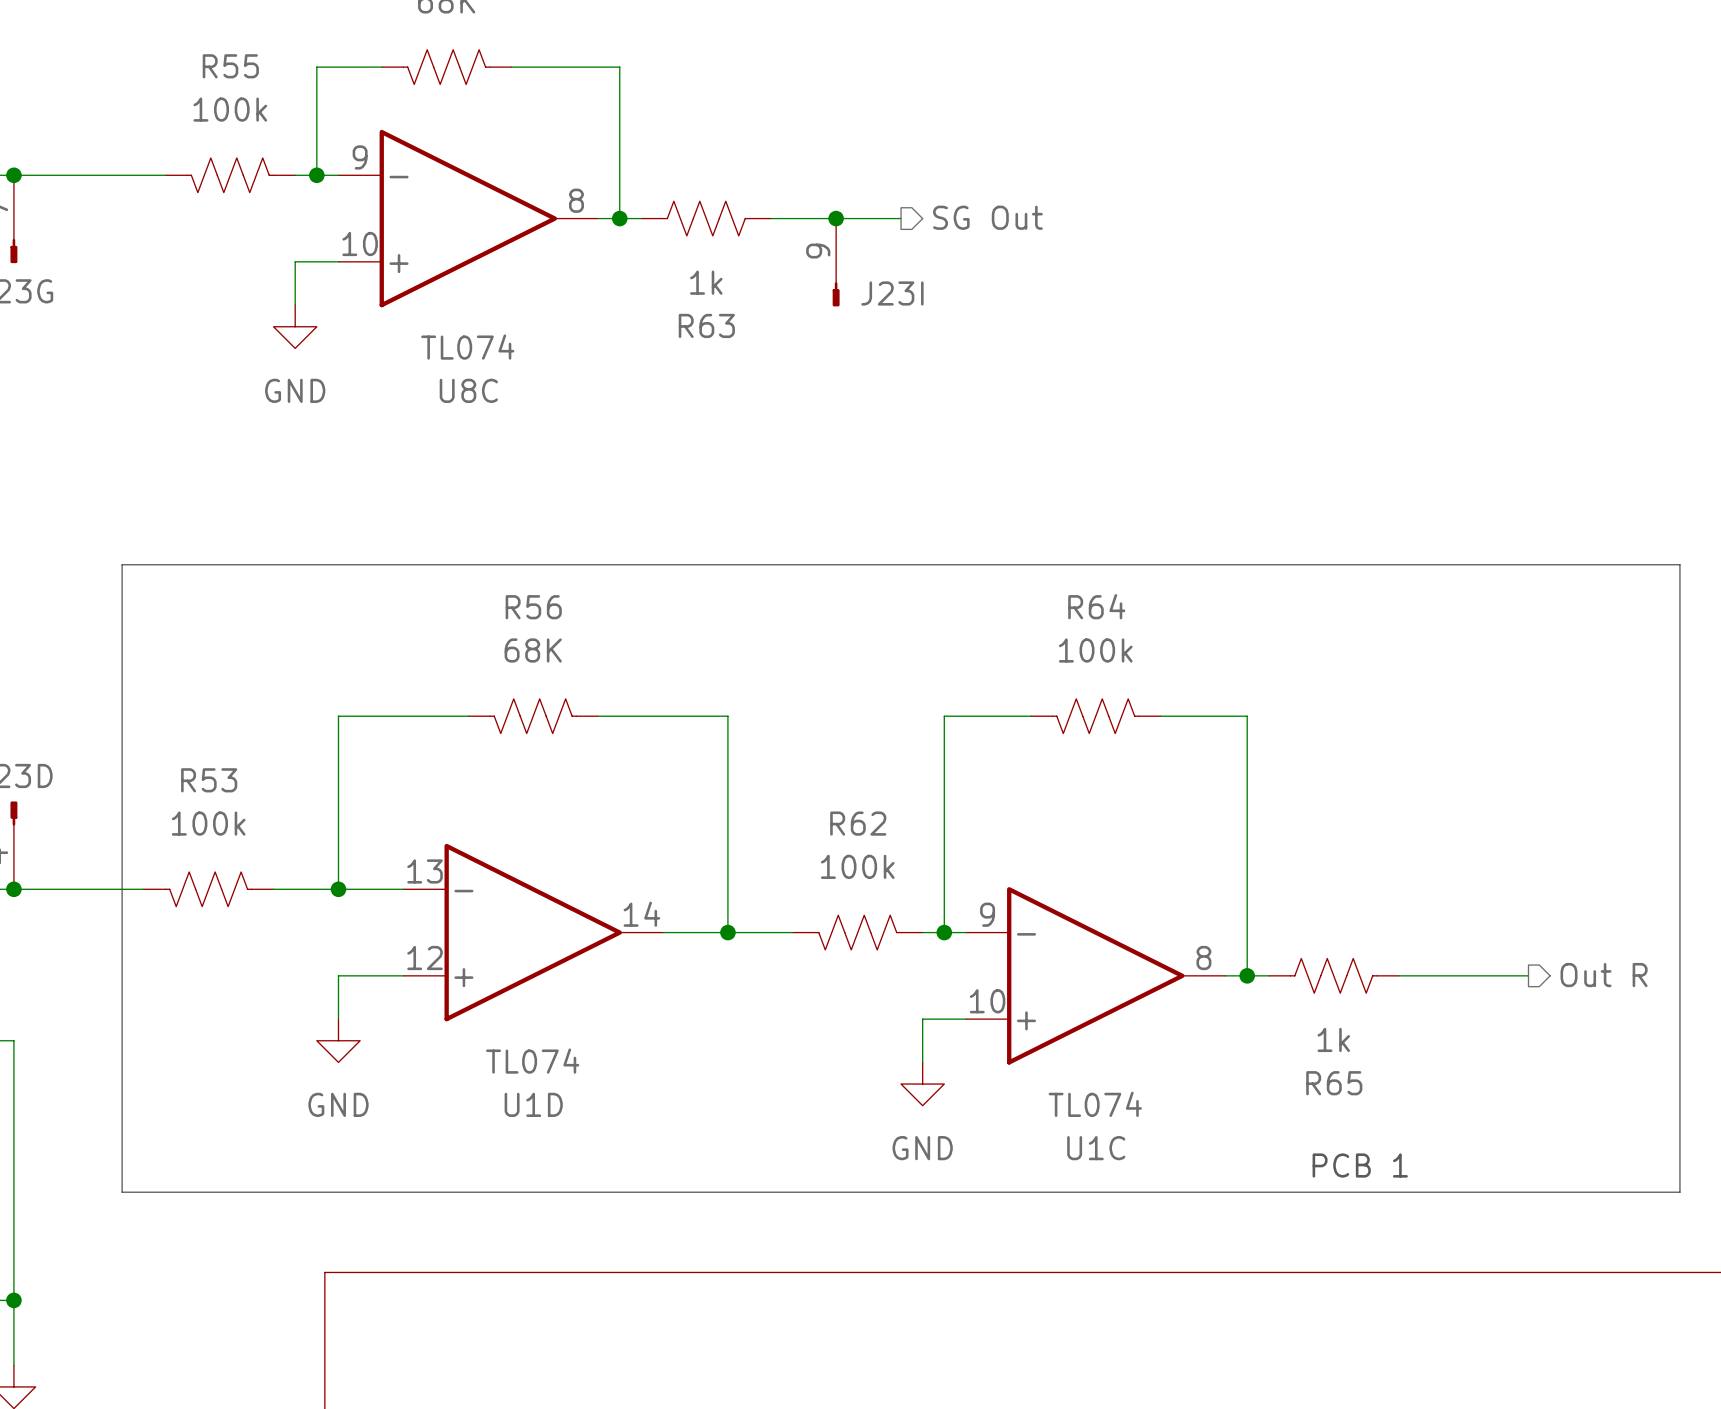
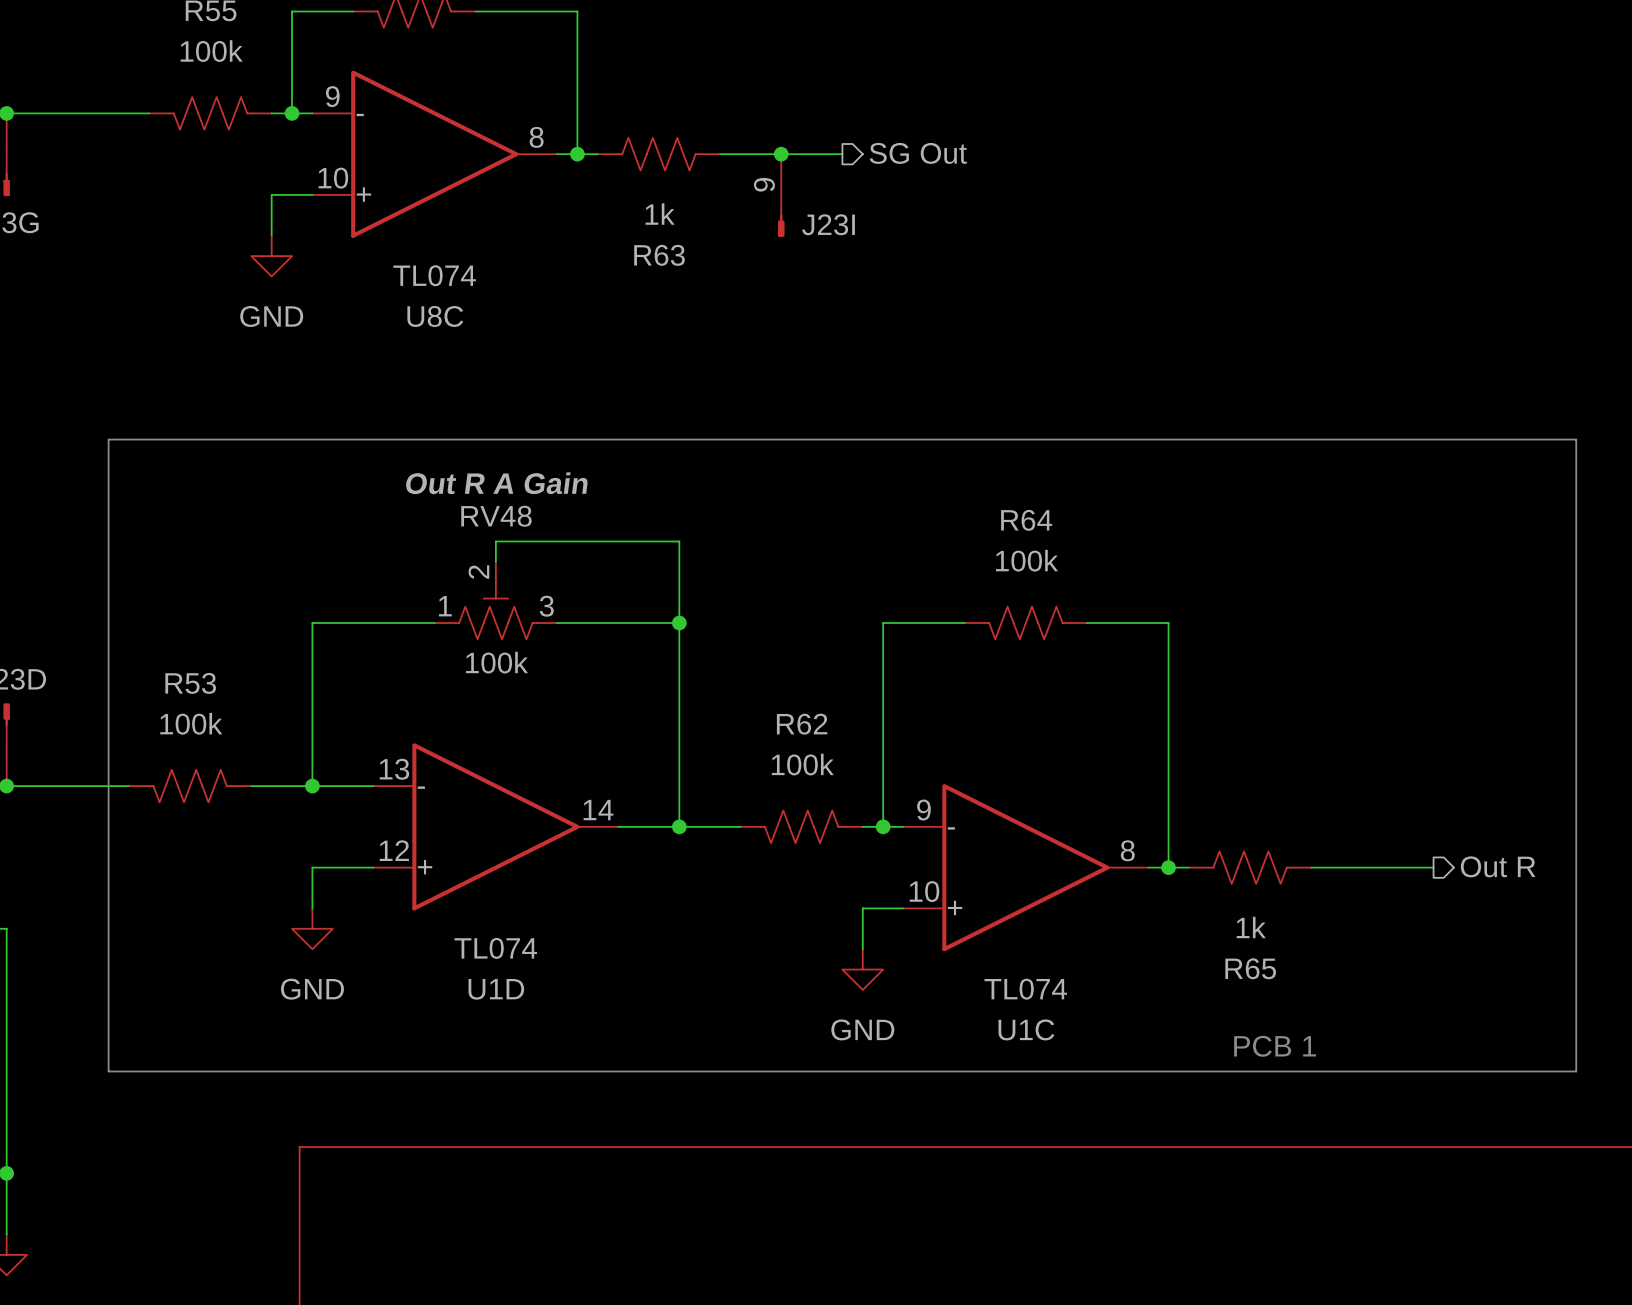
line: (122, 564) (1679, 564) -> (108, 480) (108, 439) (1576, 439) (1576, 480)
wire: none -> (495, 561) (495, 541) (679, 541) (679, 623)
RV48: none -> 100k (495, 600)
R56: 68K (533, 716) -> none
junction: none -> (679, 623)

